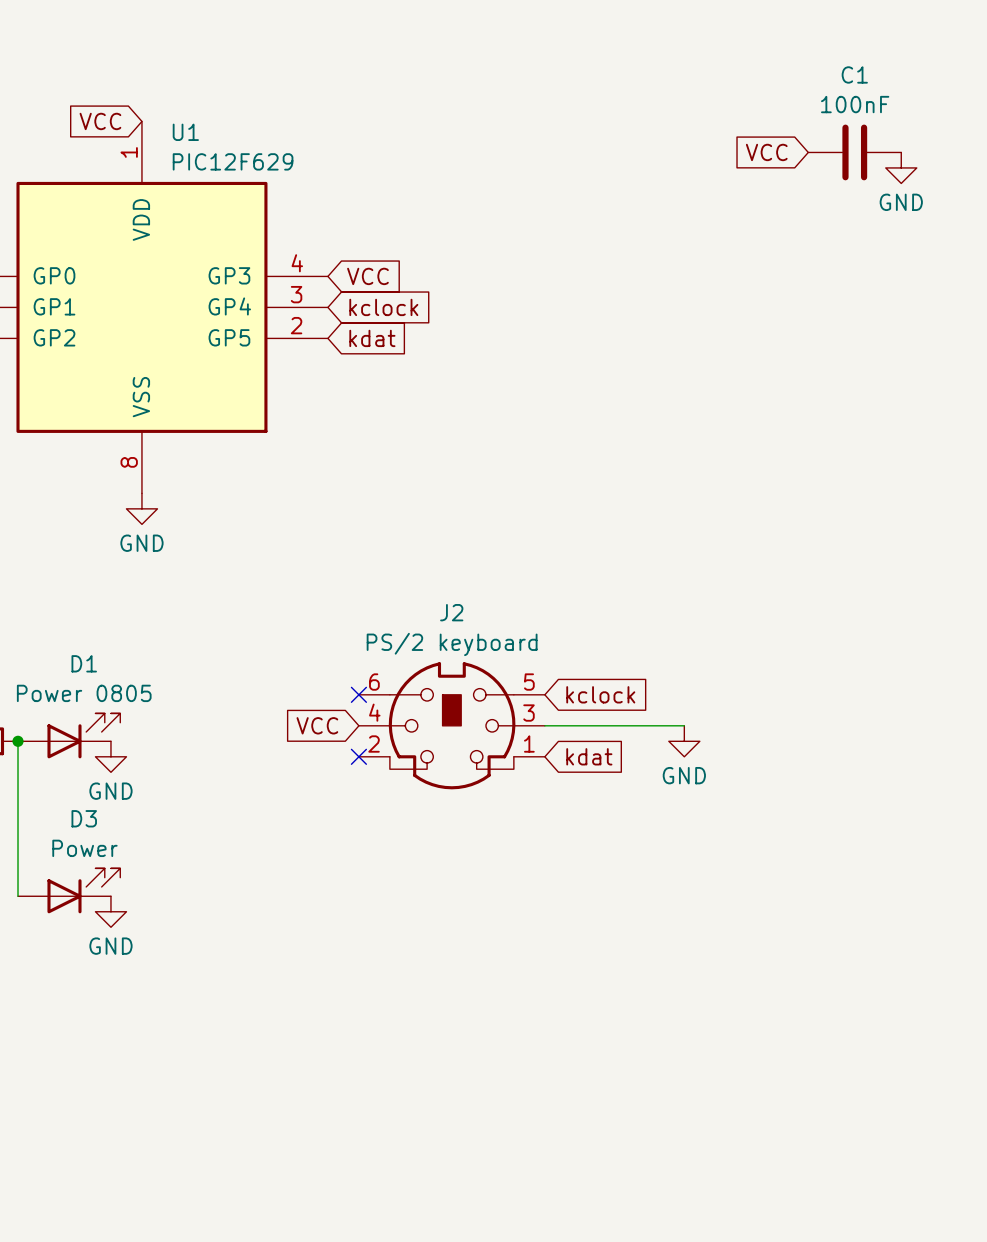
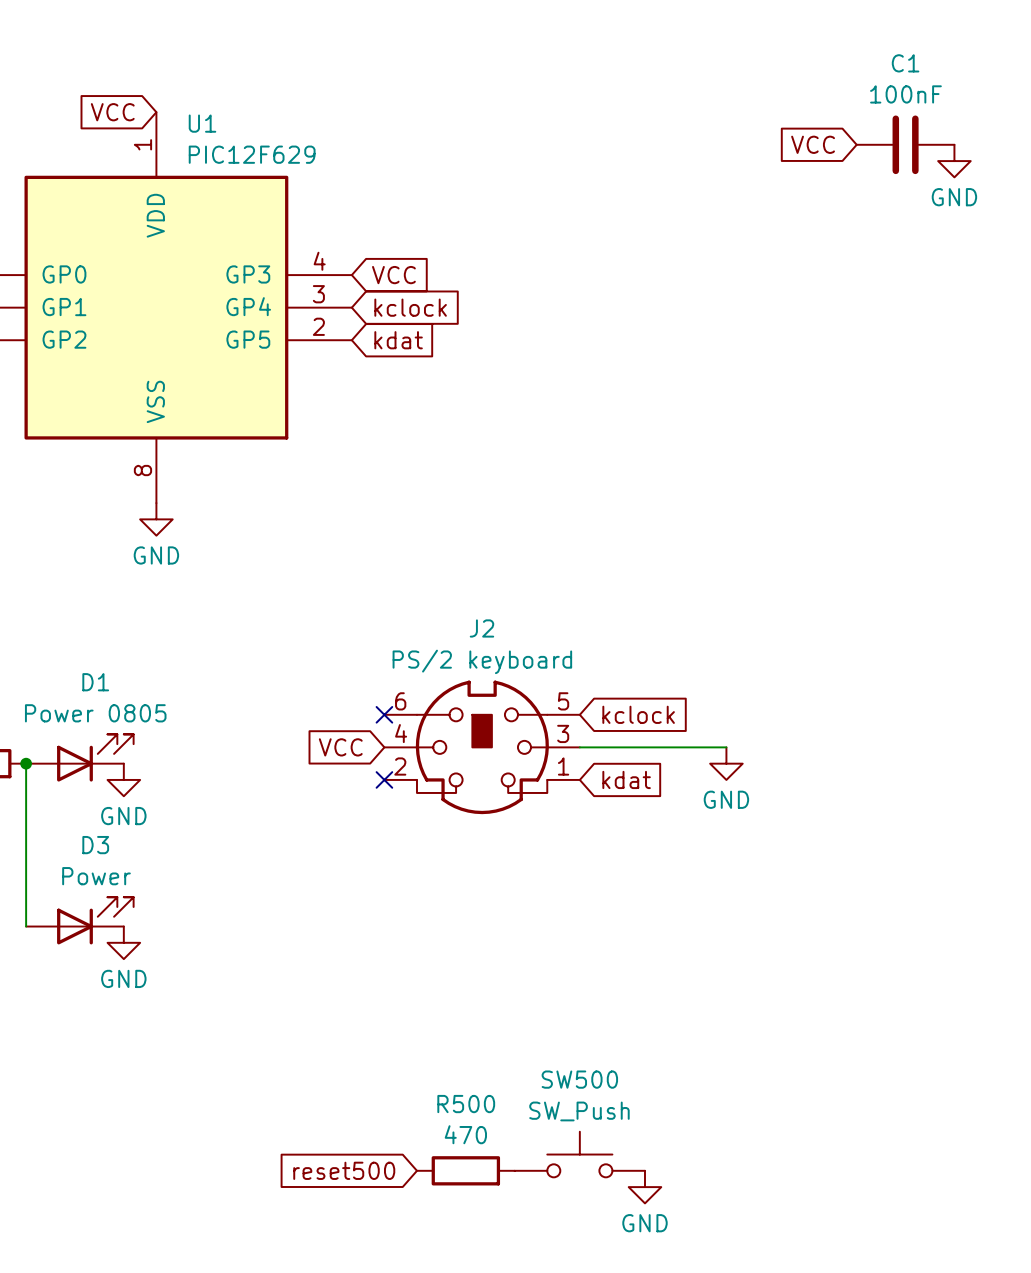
SW500: none -> SW_Push (579, 1154)
global label: none -> reset500 (344, 1170)
R500: none -> 470 (465, 1170)
power symbol: none -> GND (644, 1187)

